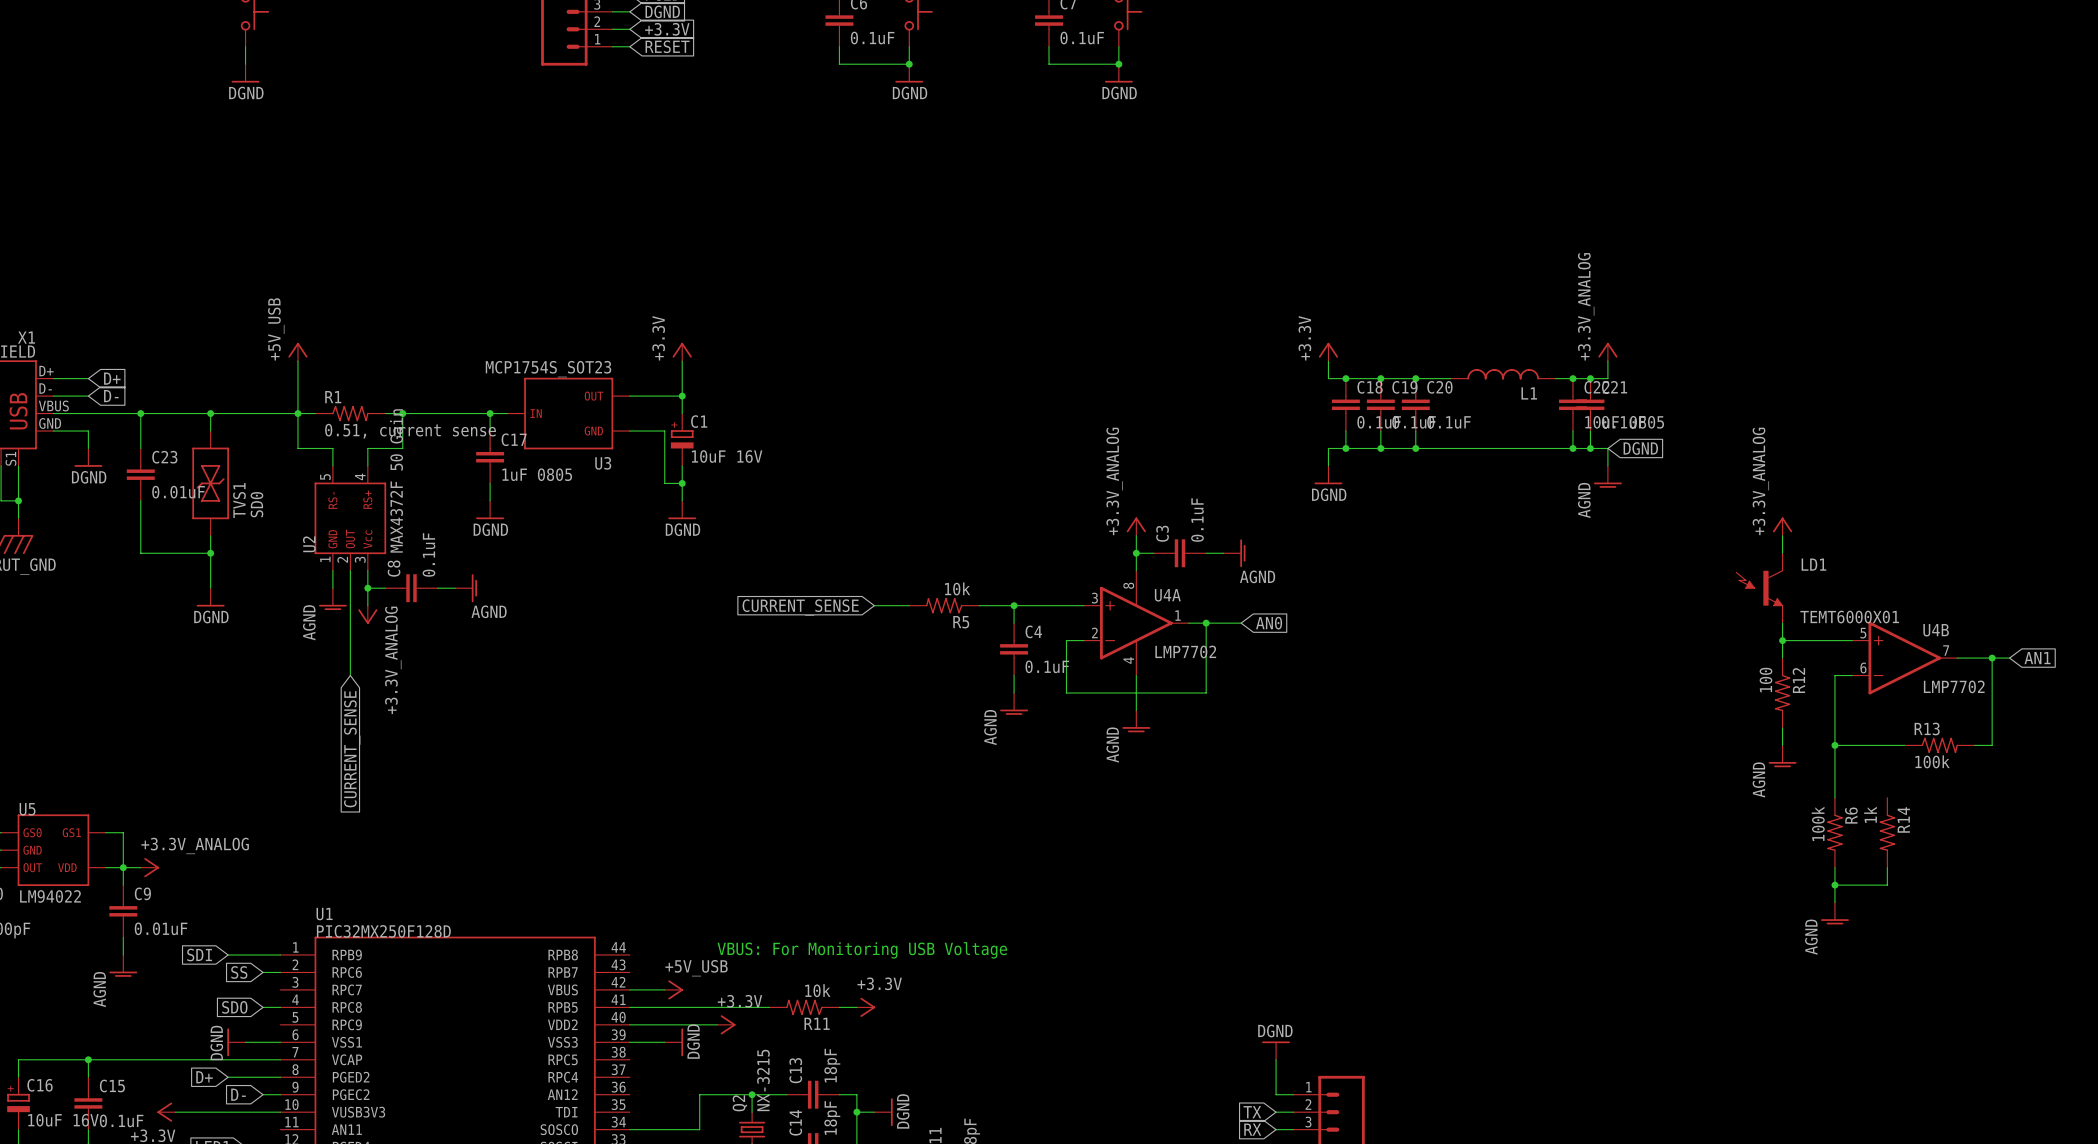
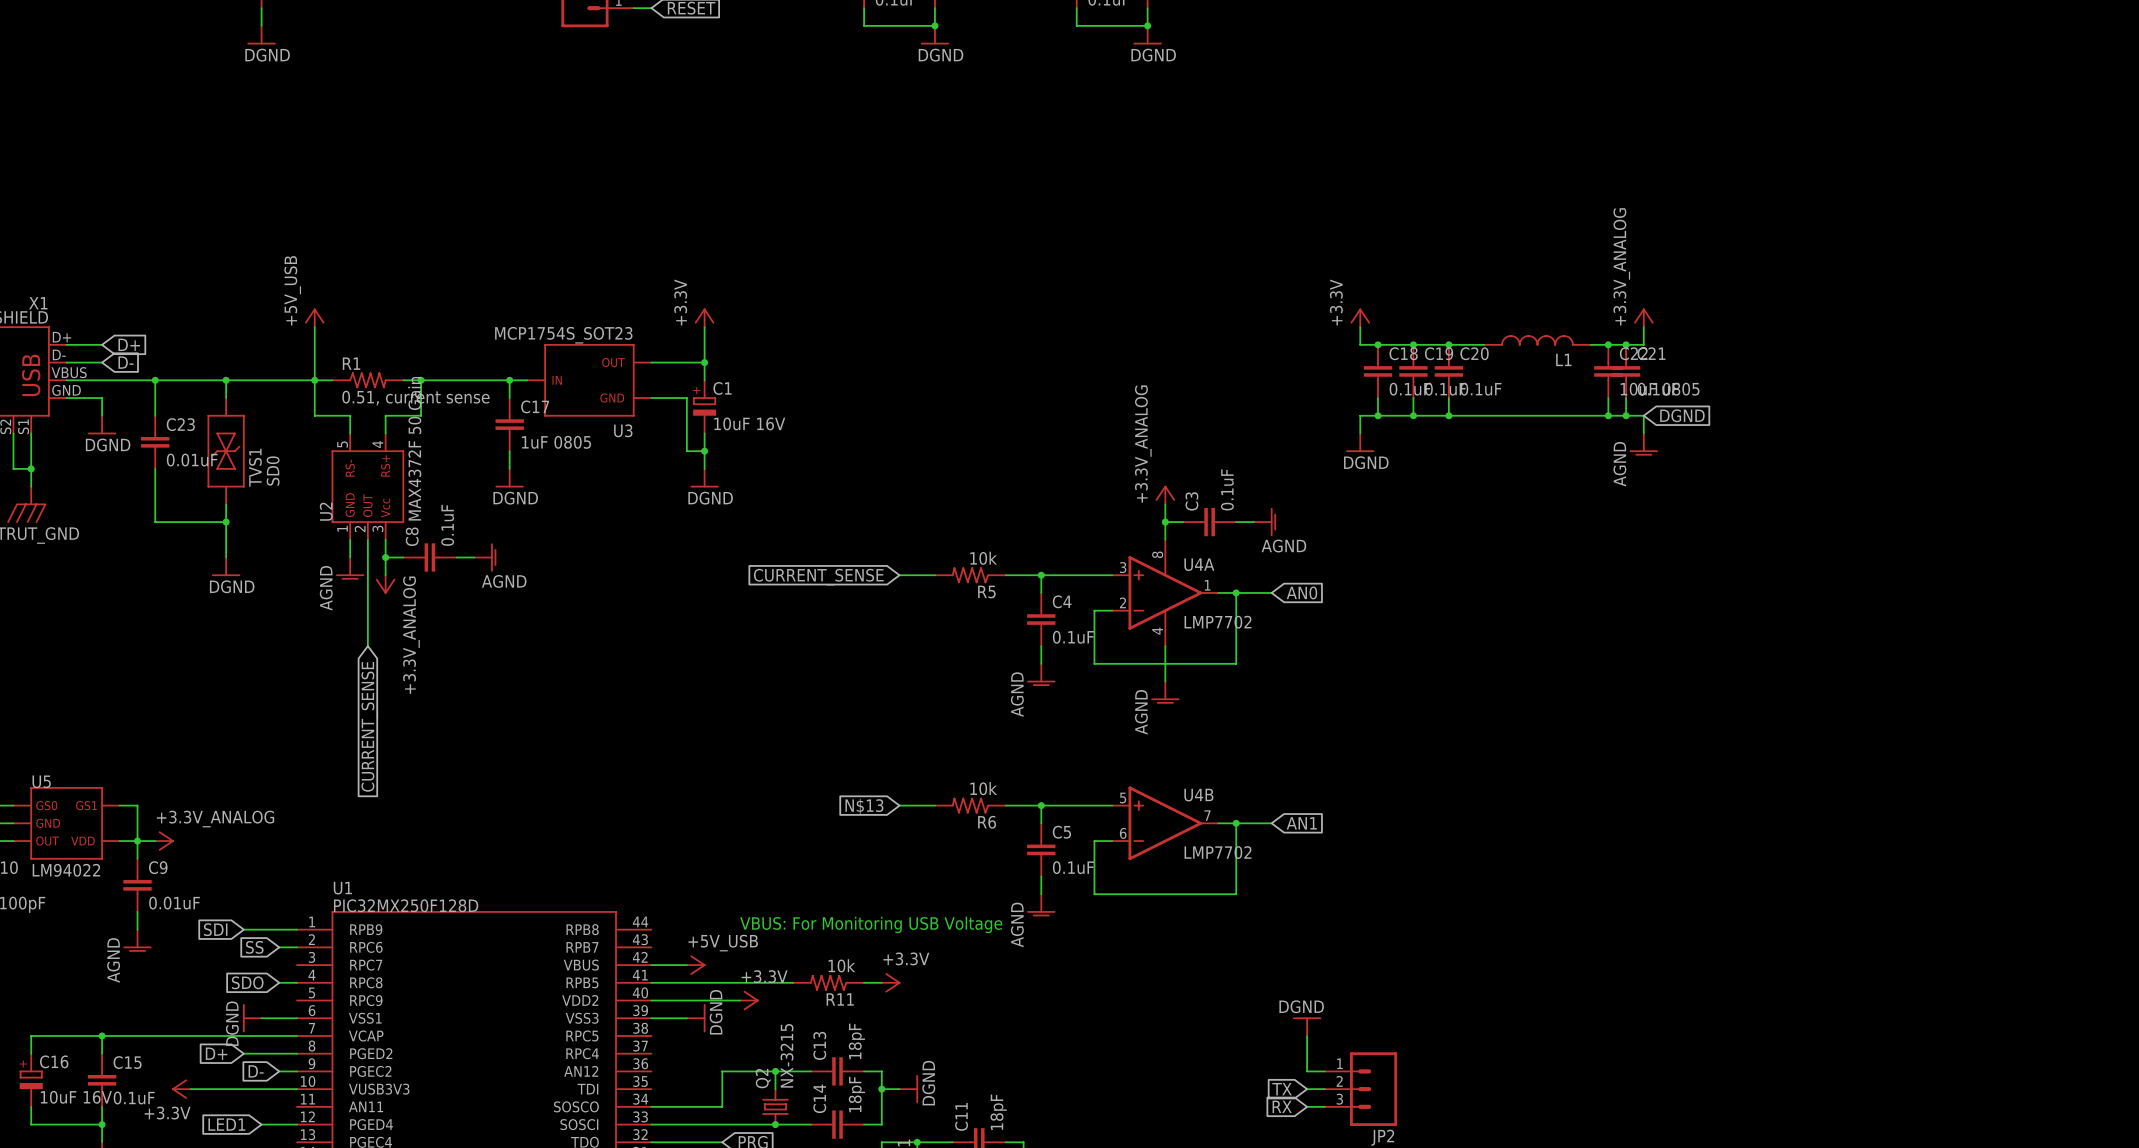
power symbol: +3.3V_ANALOG (1782, 526) -> none
wire: (1782, 535) (1782, 553) -> none
LD1: TEMT6000X01 (1759, 588) -> none
wire: (1782, 623) (1782, 658) -> none
wire: (1782, 640) (1852, 640) -> none
junction: (1782, 640) -> none
U4B position: (1904, 658) -> (1165, 823)
wire: (1957, 658) (2009, 658) -> none
wire: (1992, 658) (1992, 745) (1974, 745) -> none
junction: (1992, 658) -> none
global label: AN1 (2037, 658) -> none
wire: (1852, 675) (1834, 675) (1834, 797) -> none
R12: 100 (1782, 693) -> none
wire: (1782, 727) (1782, 745) -> none
wire: (1834, 745) (1904, 745) -> none
junction: (1834, 745) -> none
R13: 100k (1939, 745) -> none
power symbol: AGND (1782, 756) -> none
R6 value: 100k (1818, 823) -> 10k (983, 788)
wire: none -> (899, 805) (934, 805)
wire: none -> (1005, 805) (1112, 805)
wire: none -> (1041, 805) (1041, 823)
junction: none -> (1041, 805)
R6 rotation: 0° (1834, 832) -> 90° clockwise (970, 805)
R6 position: (1834, 832) -> (970, 805)
R14: 1k (1887, 832) -> none
global label: none -> N$13 (864, 806)
wire: none -> (1218, 823) (1271, 823)
wire: none -> (1236, 823) (1236, 894) (1094, 894) (1094, 841) (1112, 841)
junction: none -> (1236, 823)
global label: none -> AN1 (1301, 823)
wire: (1834, 867) (1834, 902) -> none
wire: (1887, 867) (1887, 885) (1834, 885) -> none
C5: none -> 0.1uF (1041, 849)
junction: (1834, 885) -> none
wire: none -> (1041, 876) (1041, 894)
power symbol: AGND (1834, 913) -> none
power symbol: none -> AGND (1041, 905)

